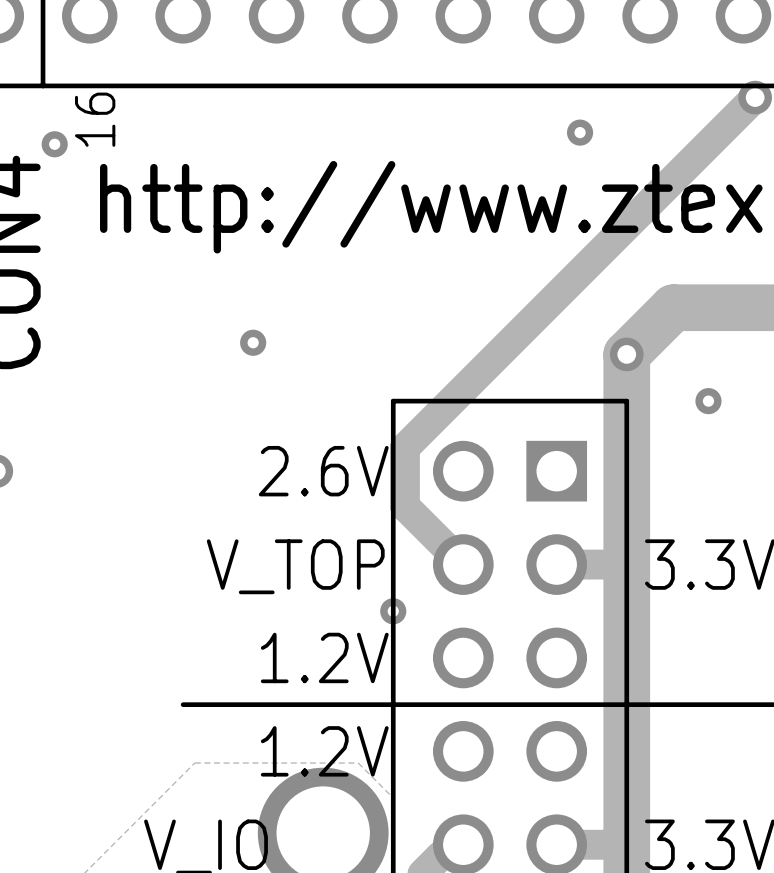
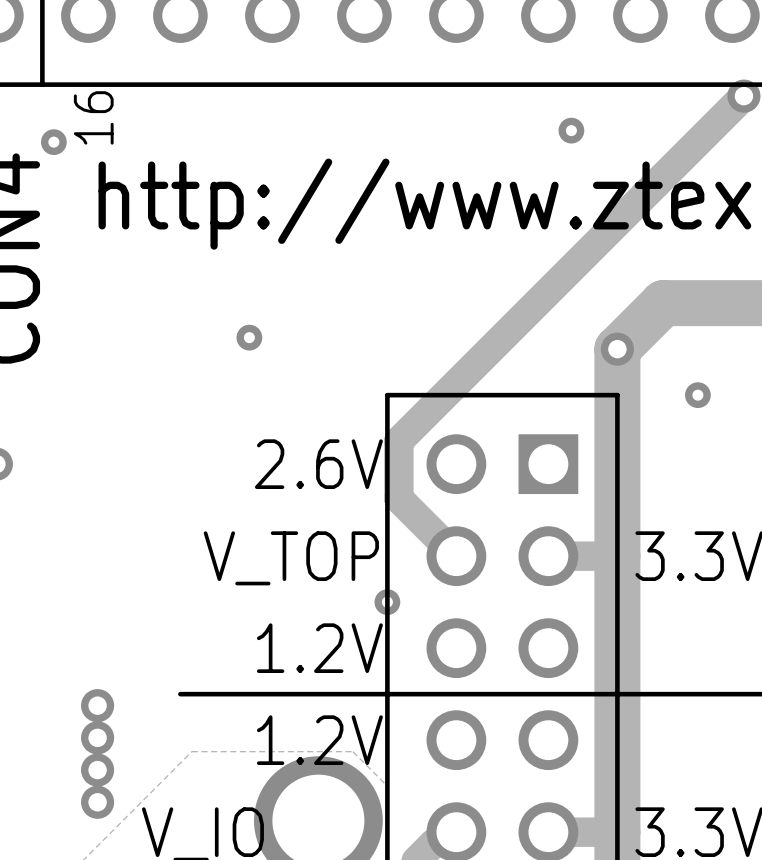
via: none -> (97, 705)
via: none -> (97, 737)
via: none -> (97, 770)
via: none -> (97, 802)

